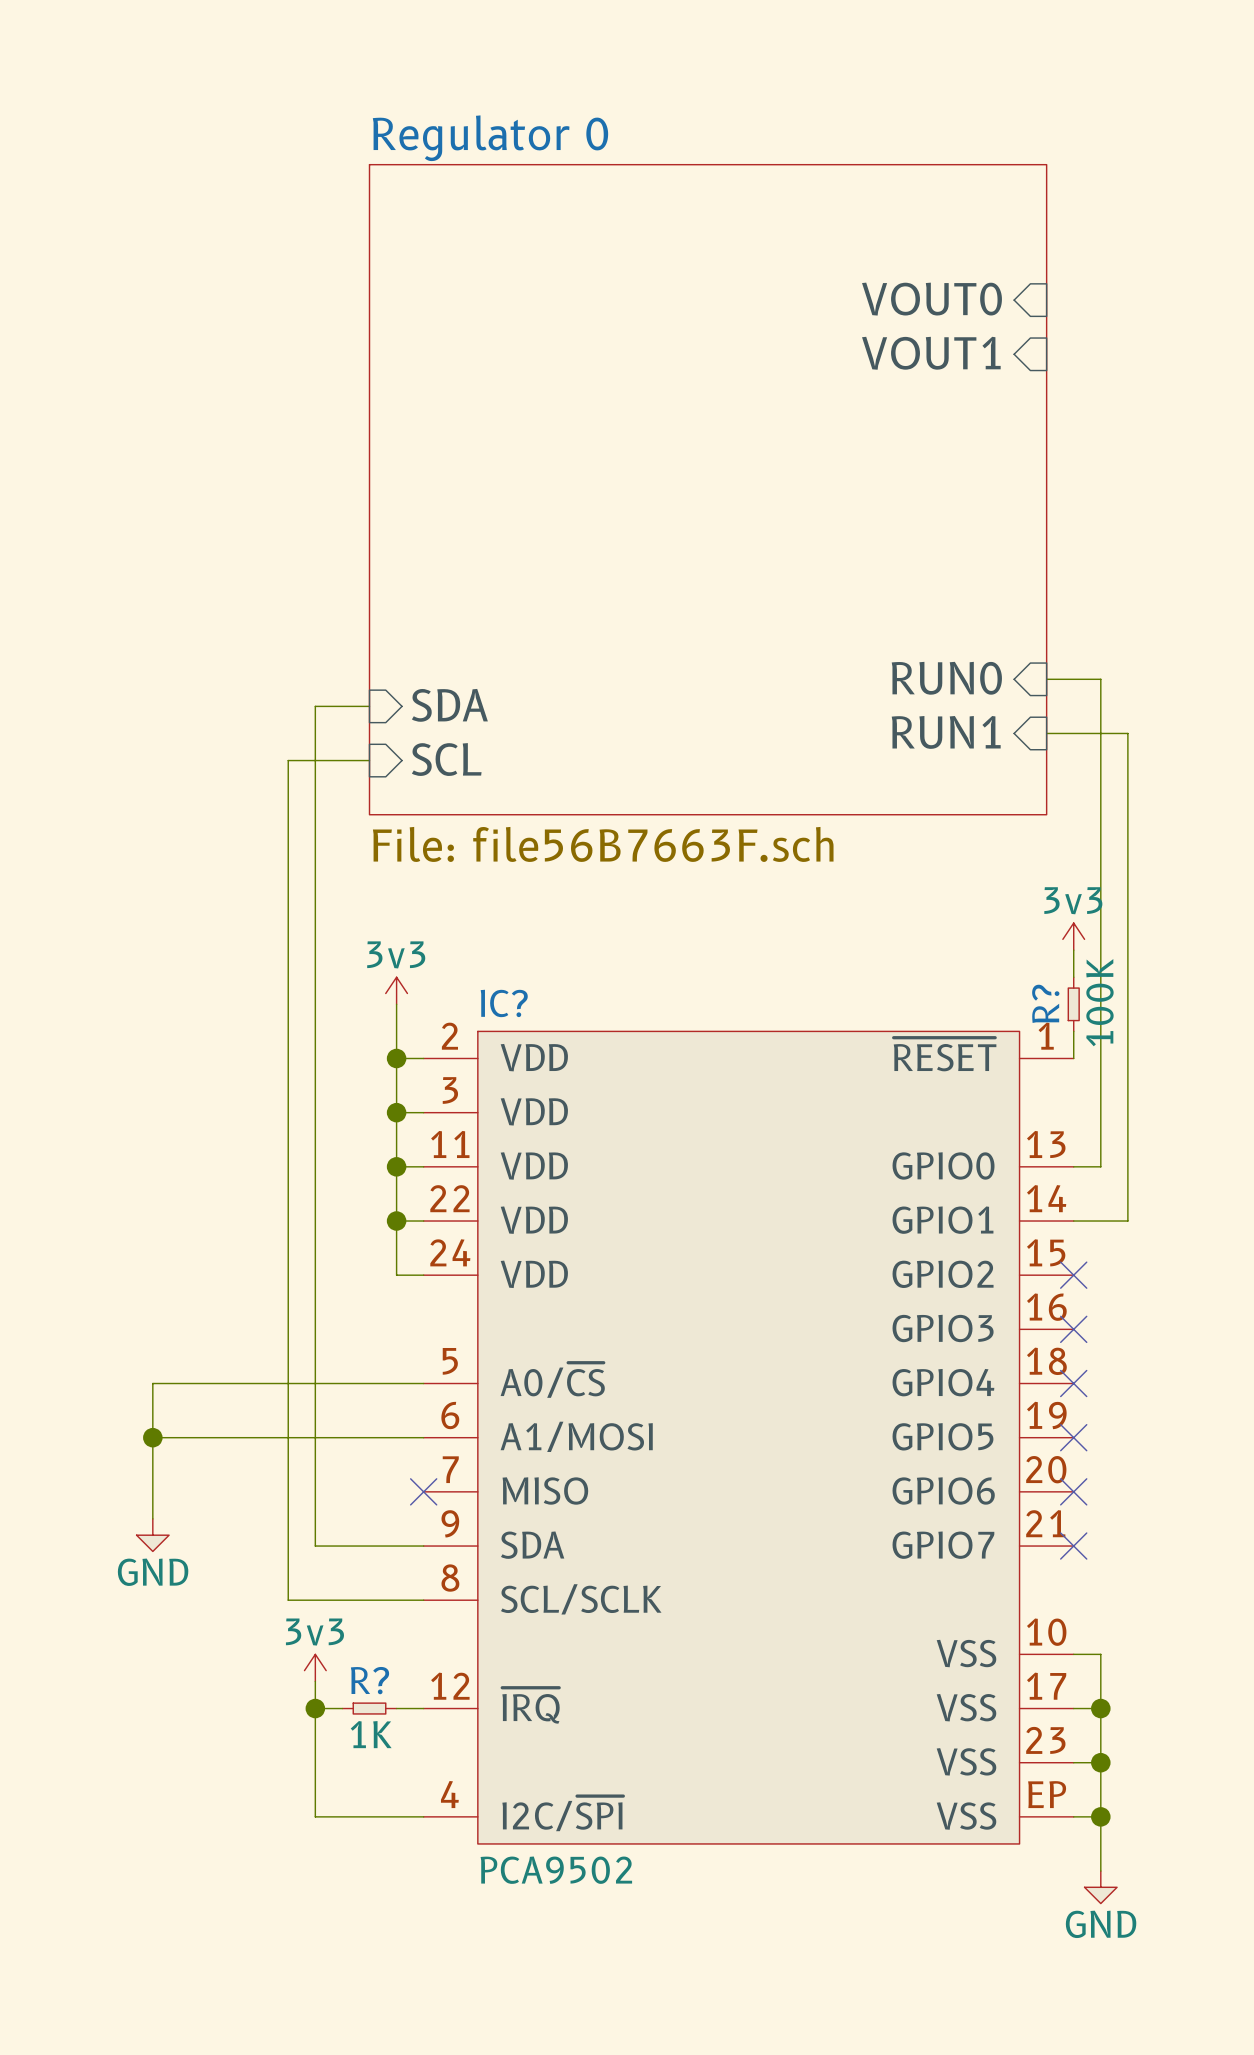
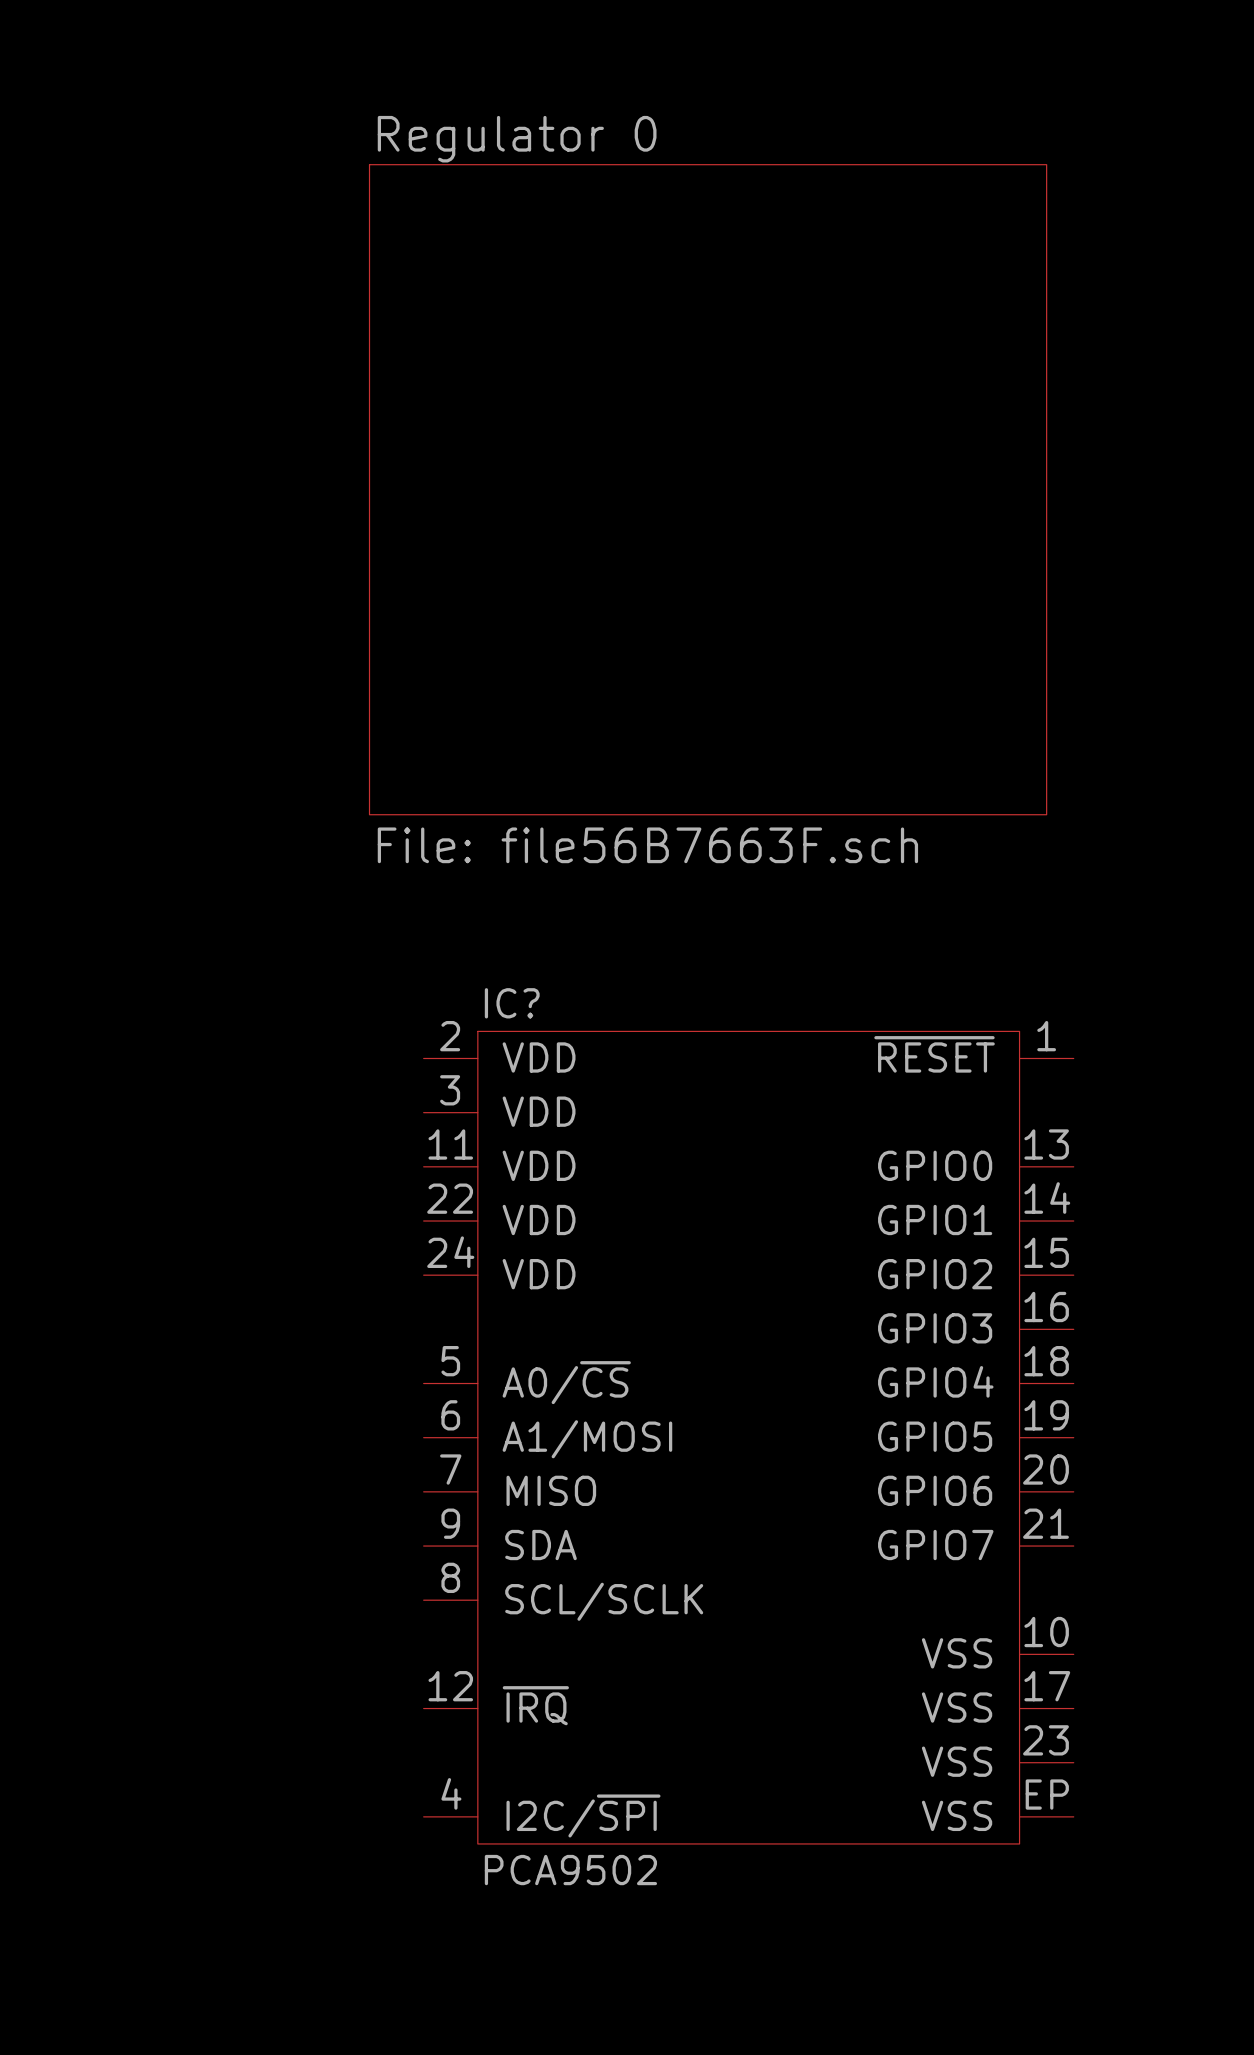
sheet pin: VOUT0 (931, 299) -> none
sheet pin: VOUT1 (931, 353) -> none
sheet pin: RUN0 (946, 678) -> none
wire: (1046, 679) (1100, 679) (1100, 1166) (1073, 1166) -> none
sheet pin: SDA (449, 705) -> none
wire: (369, 706) (315, 706) (315, 1546) (423, 1546) -> none
sheet pin: RUN1 (946, 732) -> none
wire: (1046, 733) (1127, 733) (1127, 1221) (1073, 1221) -> none
sheet pin: SCL (446, 759) -> none
wire: (369, 760) (288, 760) (288, 1600) (423, 1600) -> none
power symbol: 3v3 (1073, 936) -> none
wire: (1073, 950) (1073, 977) -> none
power symbol: 3v3 (396, 990) -> none
wire: (396, 1004) (396, 1275) (423, 1275) -> none
R?: 100K (1073, 1004) -> none
wire: (1073, 1031) (1073, 1058) -> none
wire: (396, 1058) (423, 1058) -> none
junction: (396, 1058) -> none
wire: (396, 1112) (423, 1112) -> none
junction: (396, 1112) -> none
wire: (396, 1166) (423, 1166) -> none
junction: (396, 1166) -> none
wire: (396, 1221) (423, 1221) -> none
junction: (396, 1221) -> none
no-connect mark: (1073, 1275) -> none
no-connect mark: (1073, 1329) -> none
wire: (423, 1383) (152, 1383) (152, 1518) -> none
no-connect mark: (1073, 1383) -> none
wire: (152, 1437) (423, 1437) -> none
junction: (152, 1437) -> none
no-connect mark: (1073, 1437) -> none
no-connect mark: (423, 1491) -> none
no-connect mark: (1073, 1491) -> none
power symbol: GND (152, 1535) -> none
no-connect mark: (1073, 1546) -> none
wire: (1073, 1654) (1100, 1654) (1100, 1871) -> none
power symbol: 3v3 (315, 1667) -> none
wire: (315, 1681) (315, 1816) (423, 1816) -> none
wire: (315, 1708) (342, 1708) -> none
junction: (315, 1708) -> none
R?: 1K (369, 1708) -> none
wire: (396, 1708) (423, 1708) -> none
wire: (1073, 1708) (1100, 1708) -> none
junction: (1100, 1708) -> none
wire: (1073, 1762) (1100, 1762) -> none
junction: (1100, 1762) -> none
wire: (1073, 1816) (1100, 1816) -> none
junction: (1100, 1816) -> none
power symbol: GND (1100, 1887) -> none

